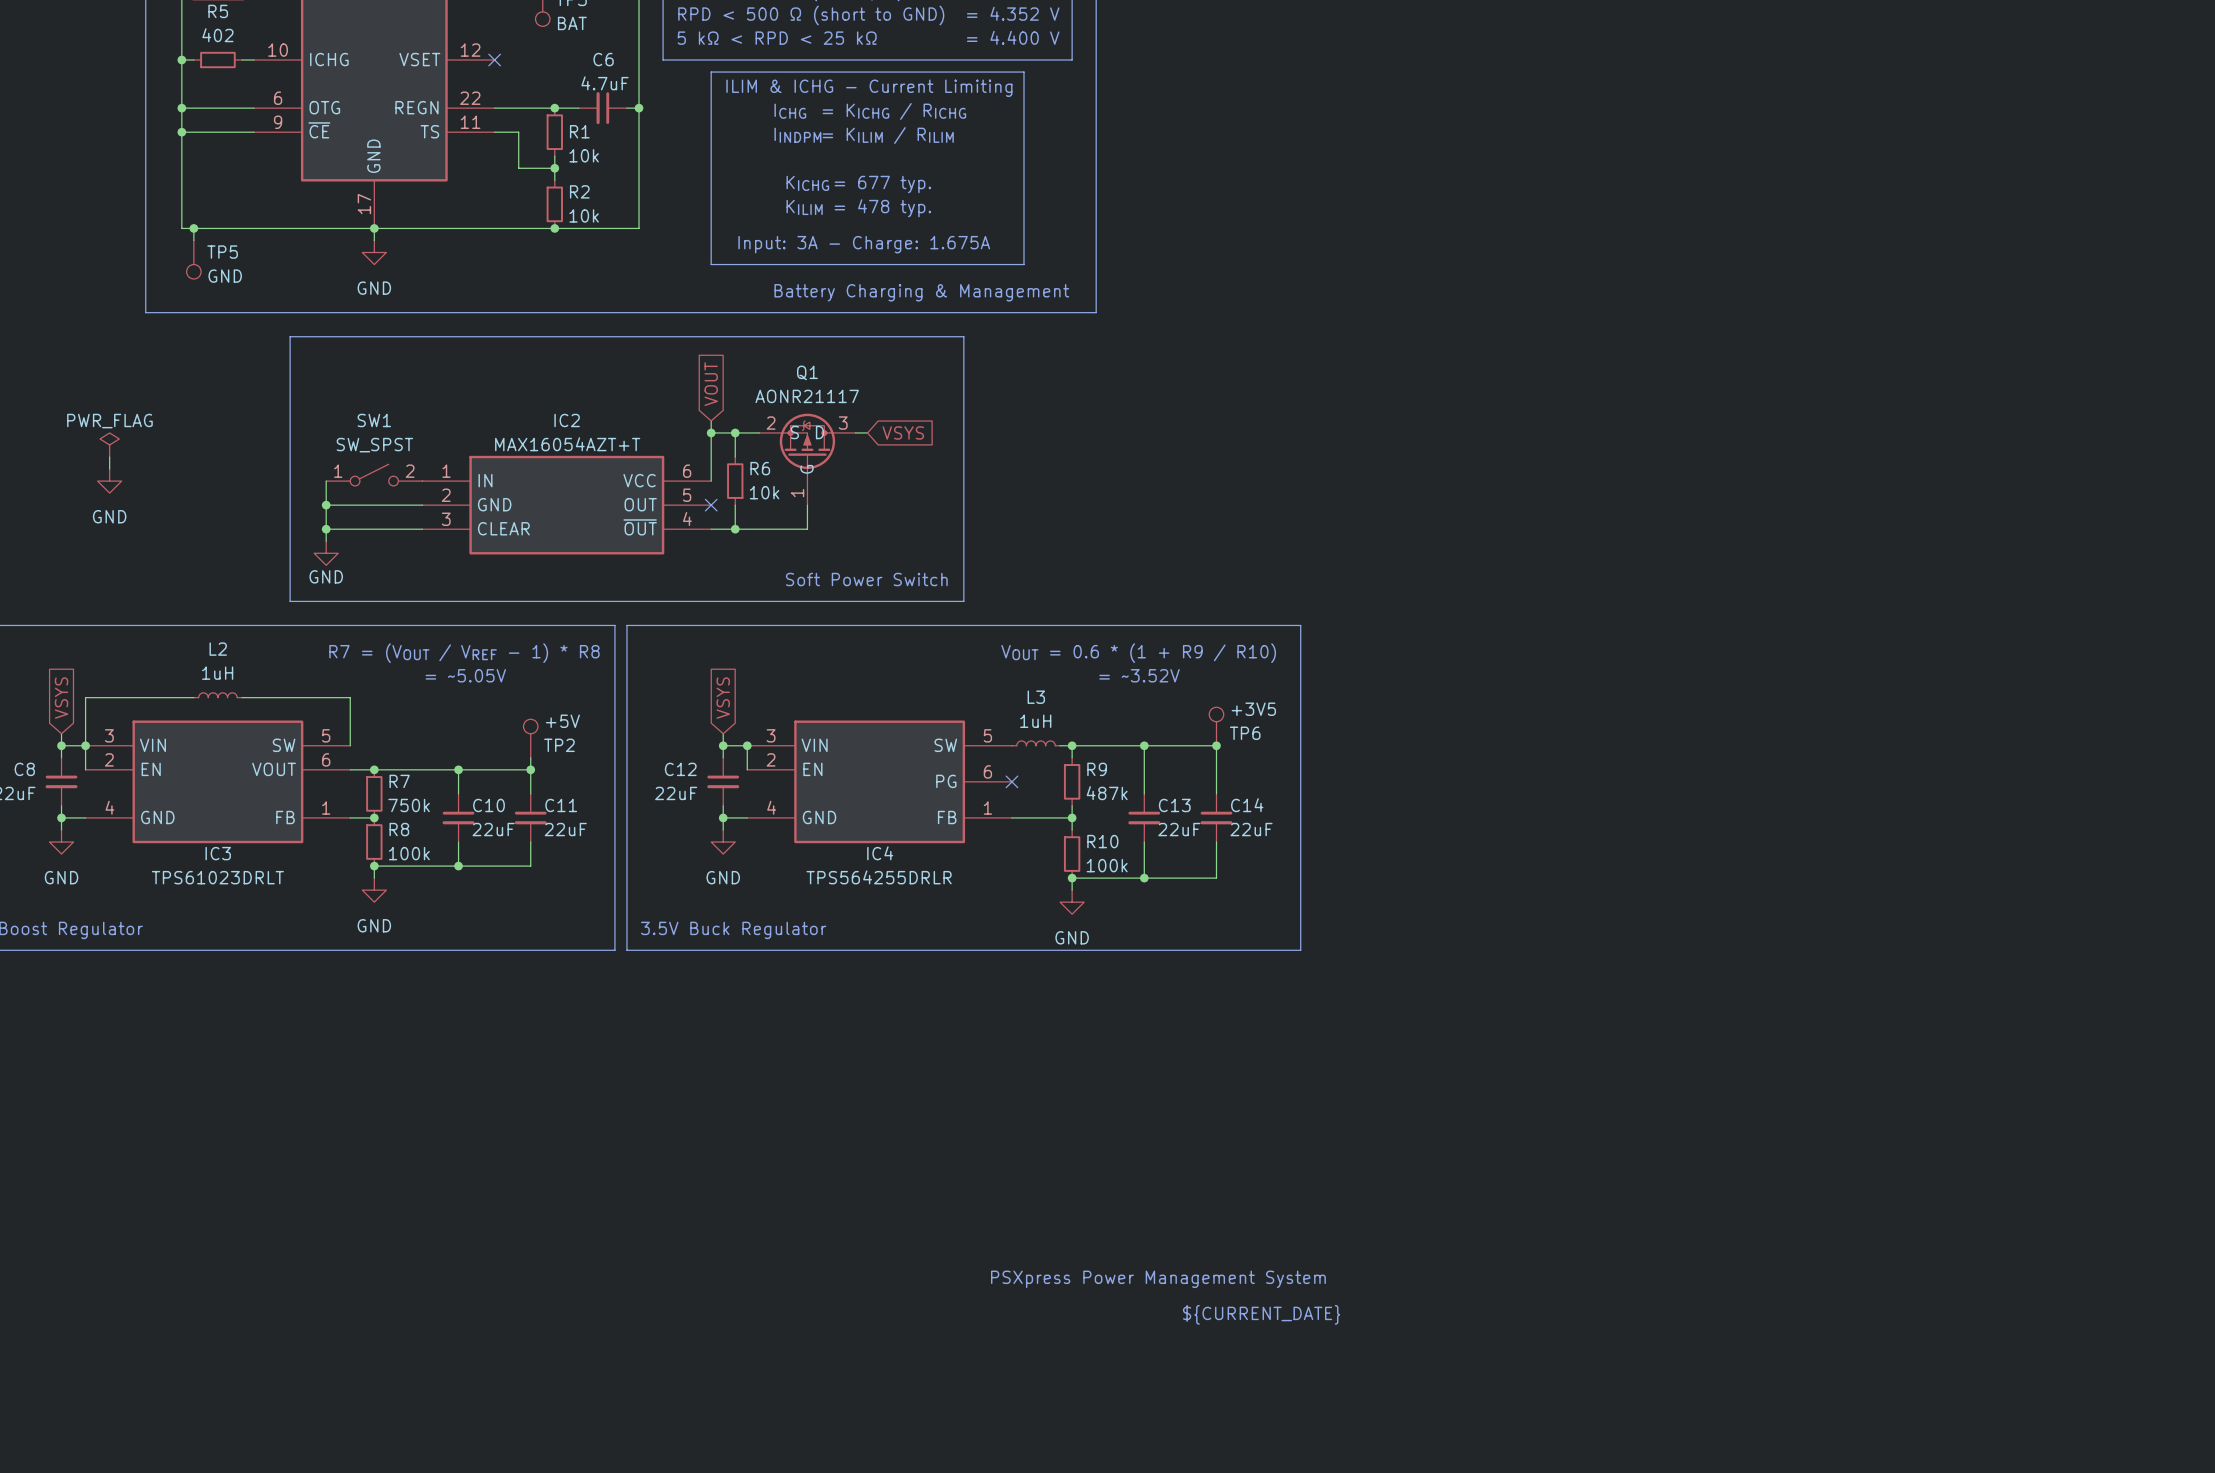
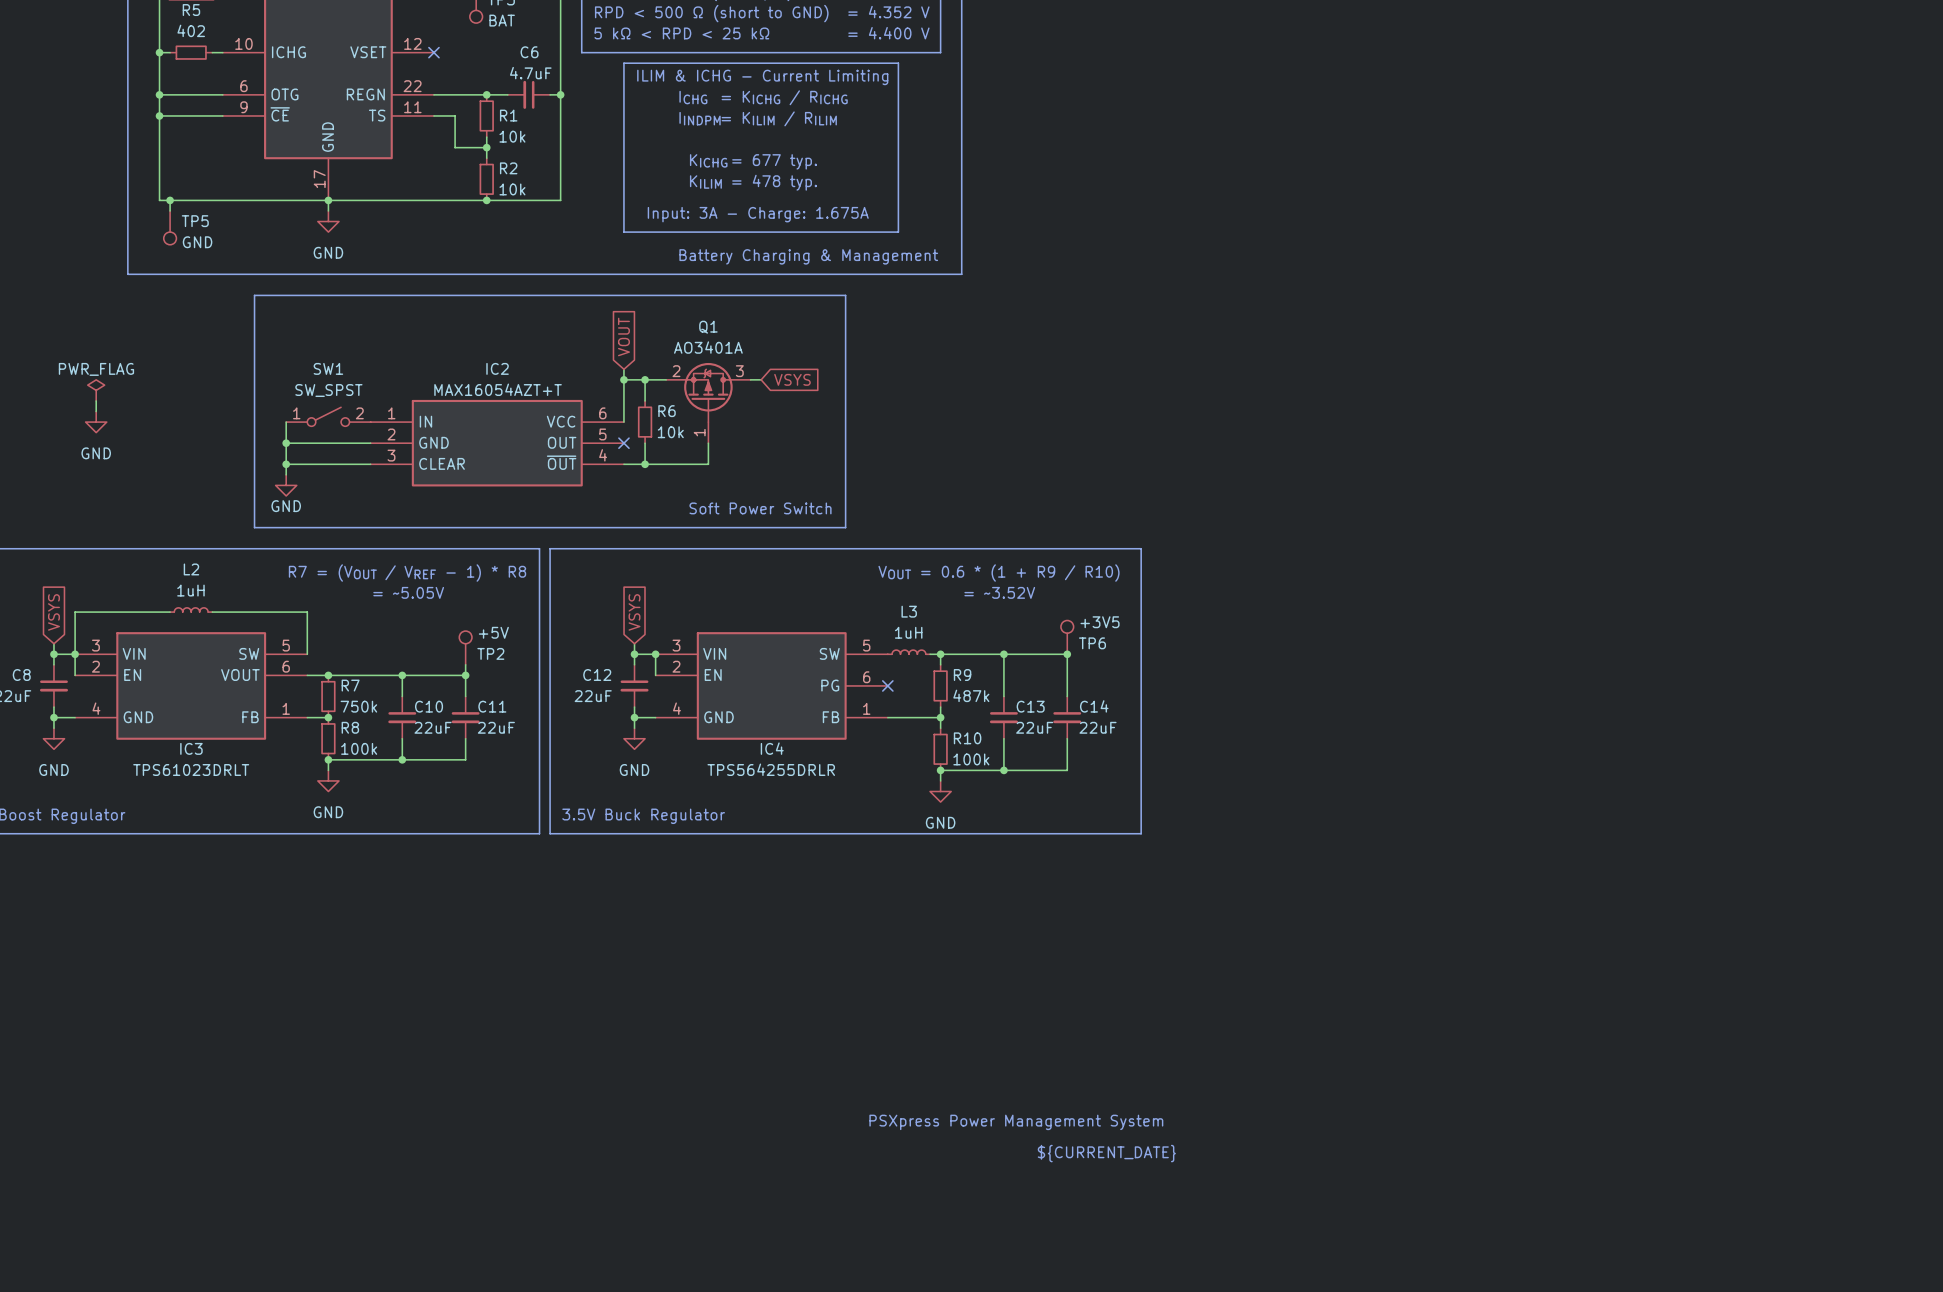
Q1 value: AONR21117 (807, 396) -> AO3401A (708, 347)
Q1 pin name: S (794, 432) -> none
Q1 pin name: D (820, 432) -> none
Q1 pin name: G (806, 469) -> none

